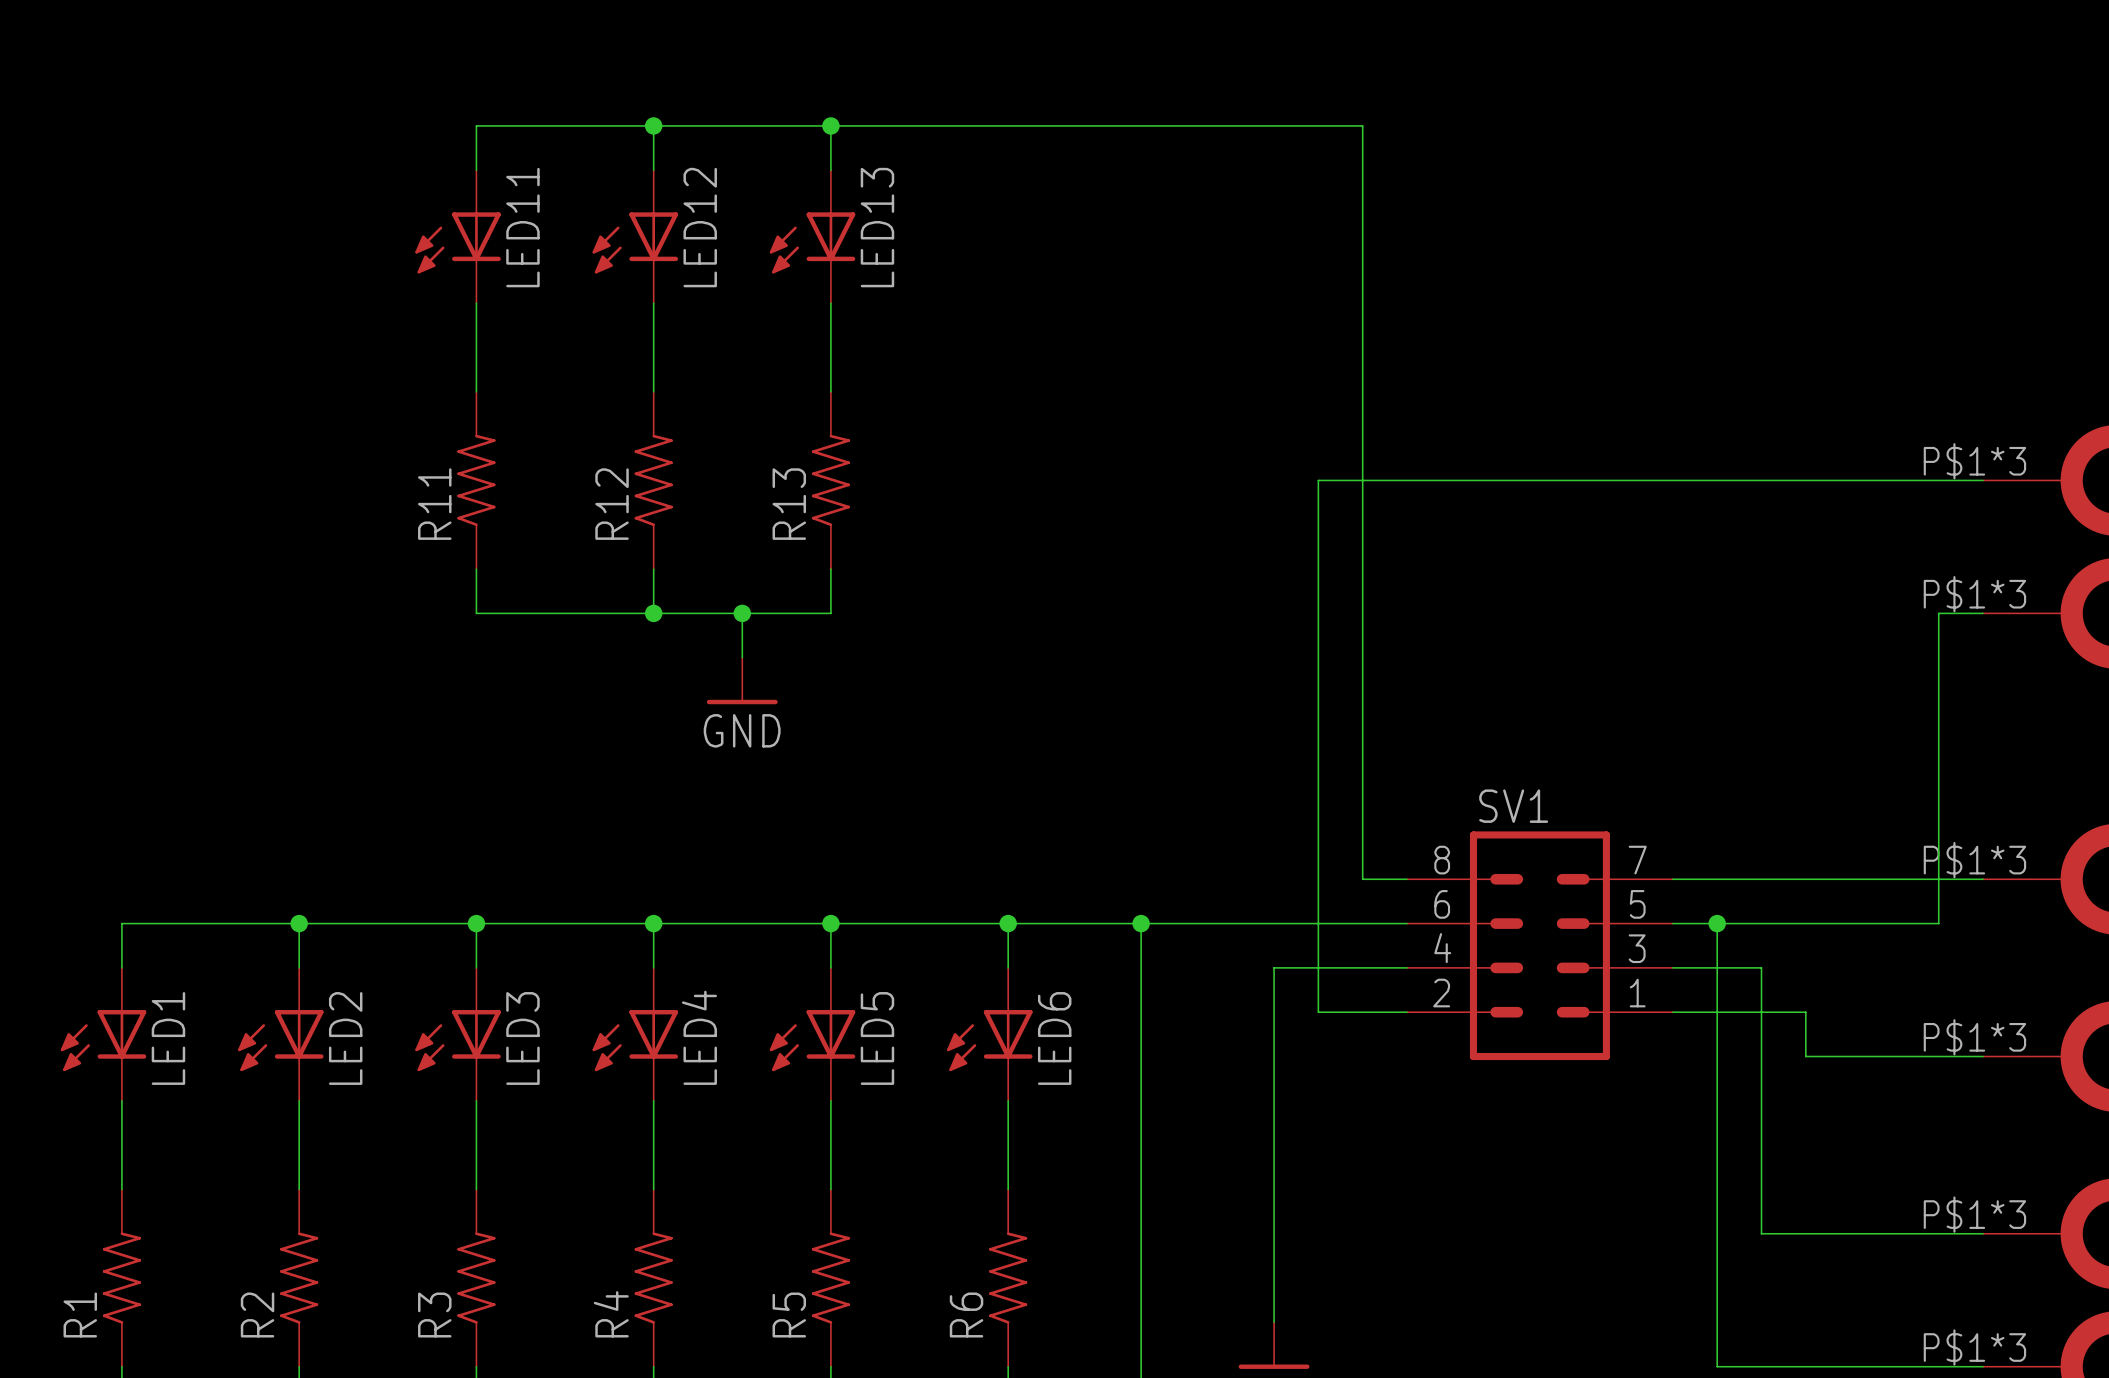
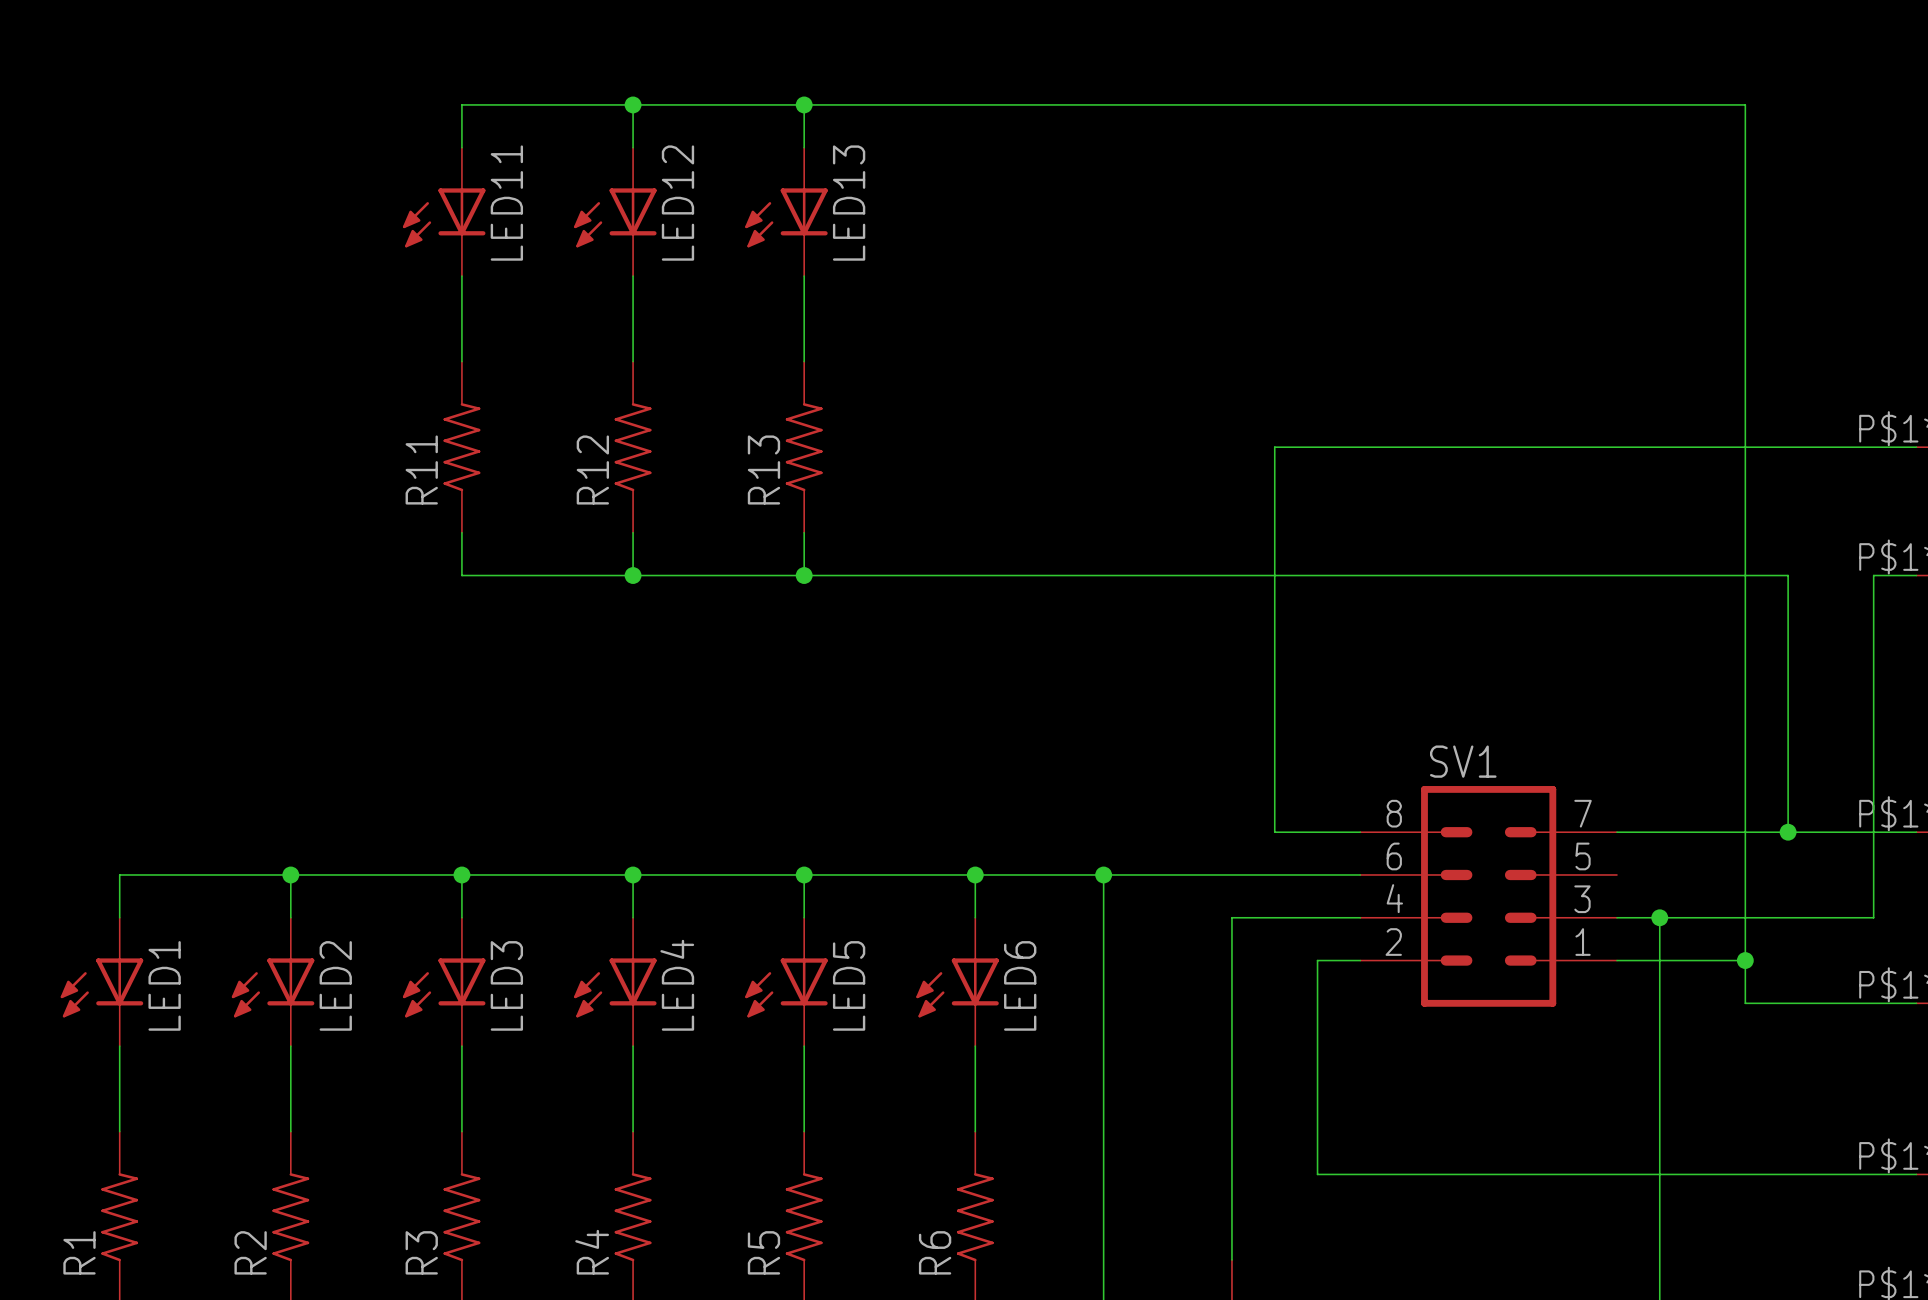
wire: (1362, 125) (1362, 879) -> (1317, 104) (1745, 104) (1745, 960)
wire: (742, 613) (742, 657) -> none
junction position: (742, 613) -> (804, 575)
wire: none -> (804, 575) (1788, 575) (1788, 832)
power symbol: GND (742, 680) -> none
wire: (1318, 879) (1318, 1012) (1362, 1012) -> (1274, 832) (1317, 832)
junction: none -> (1788, 832)
wire: (1672, 923) (1938, 923) -> (1702, 917) (1873, 917) (1873, 874)
wire: (1717, 923) (1717, 967) -> none
junction position: (1717, 923) -> (1659, 917)
wire: (1761, 967) (1761, 1233) -> (1317, 960) (1317, 1174) (1702, 1174)
junction: none -> (1745, 960)

